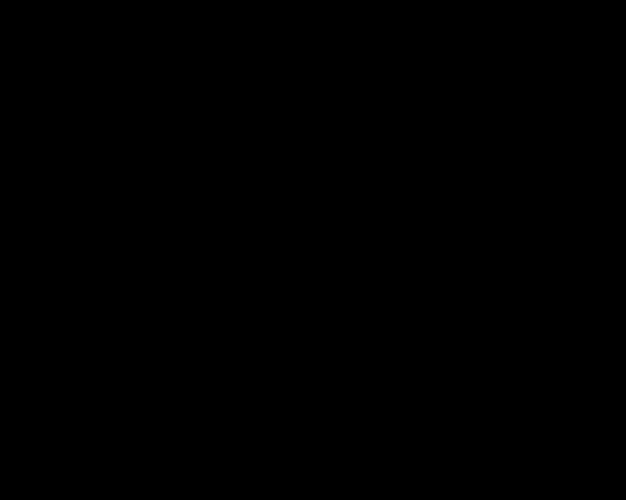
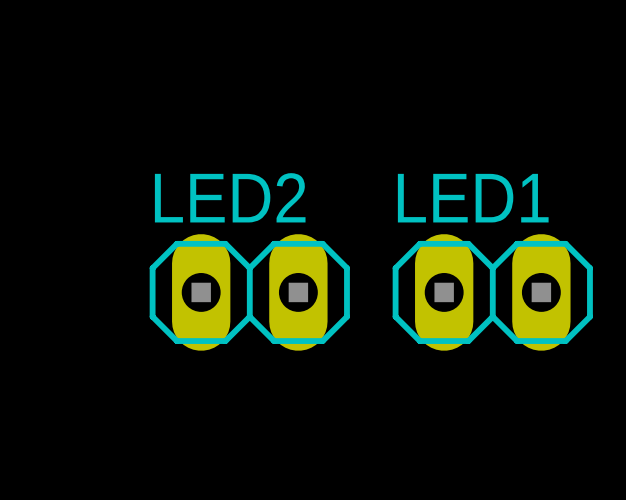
LED2: none -> (249, 292)
LED1: none -> (492, 292)

